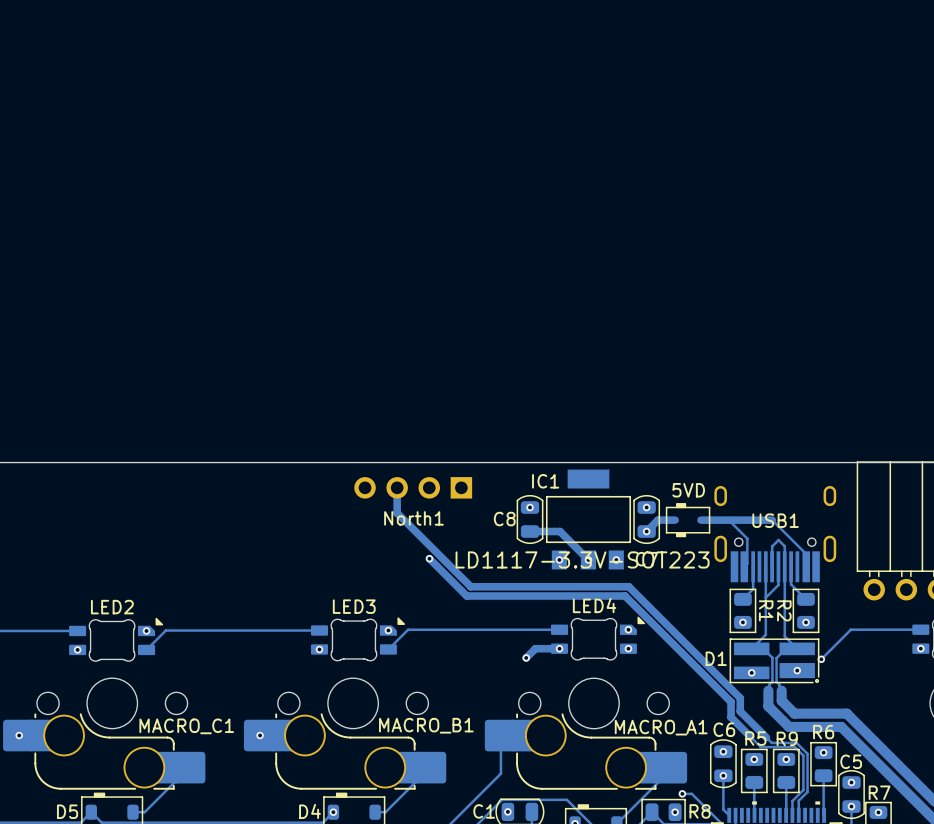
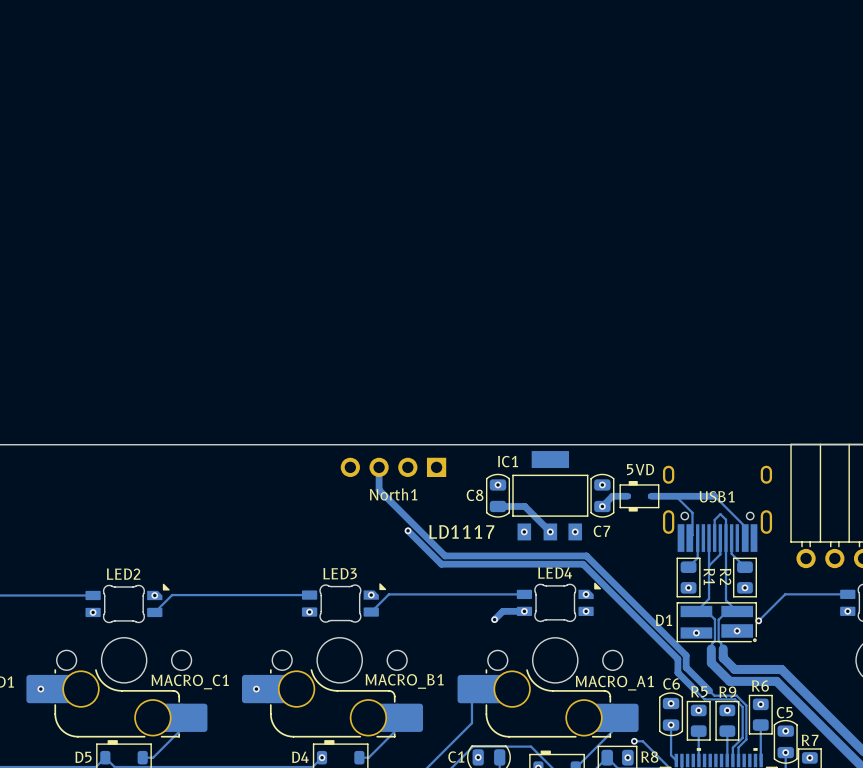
IC1 value: LD1117-3.3V-SOT223 (582, 559) -> LD1117 (461, 531)

